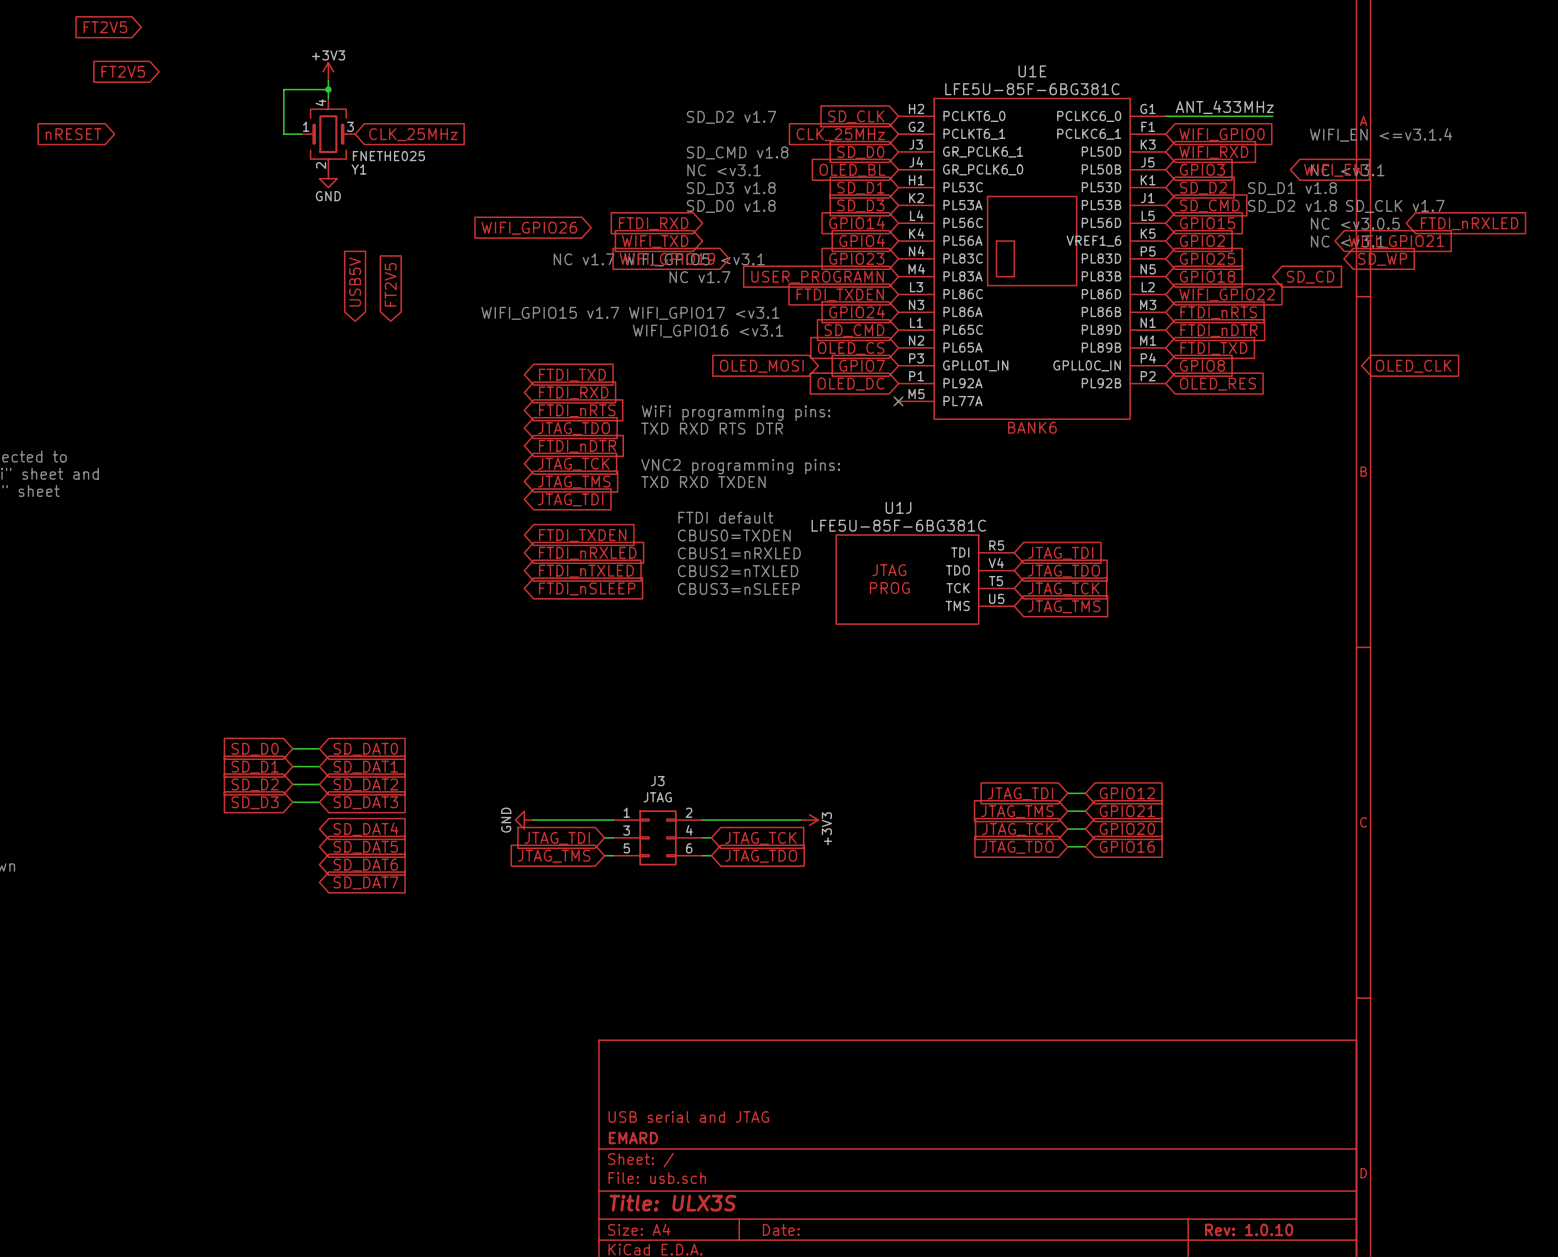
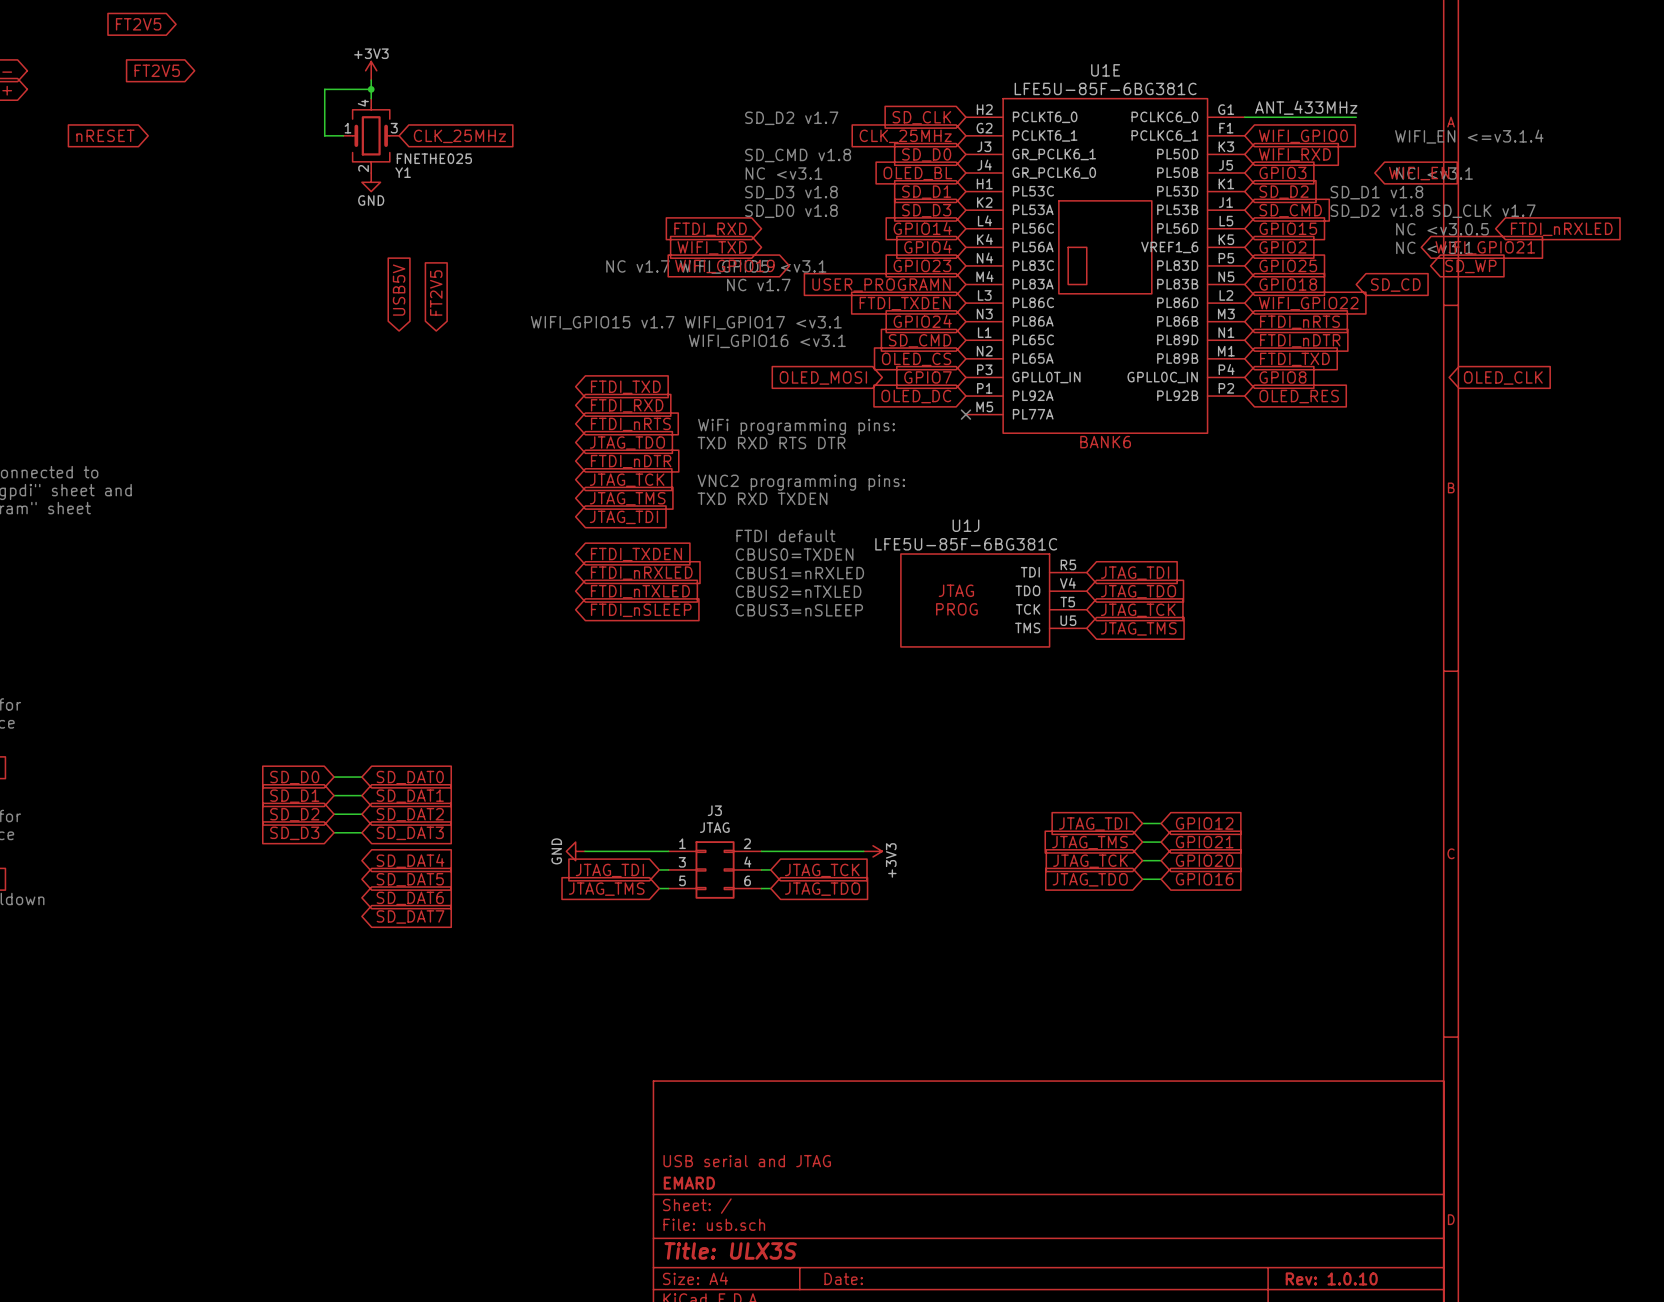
global label: WIFI_GPIO26 (529, 228) -> none

